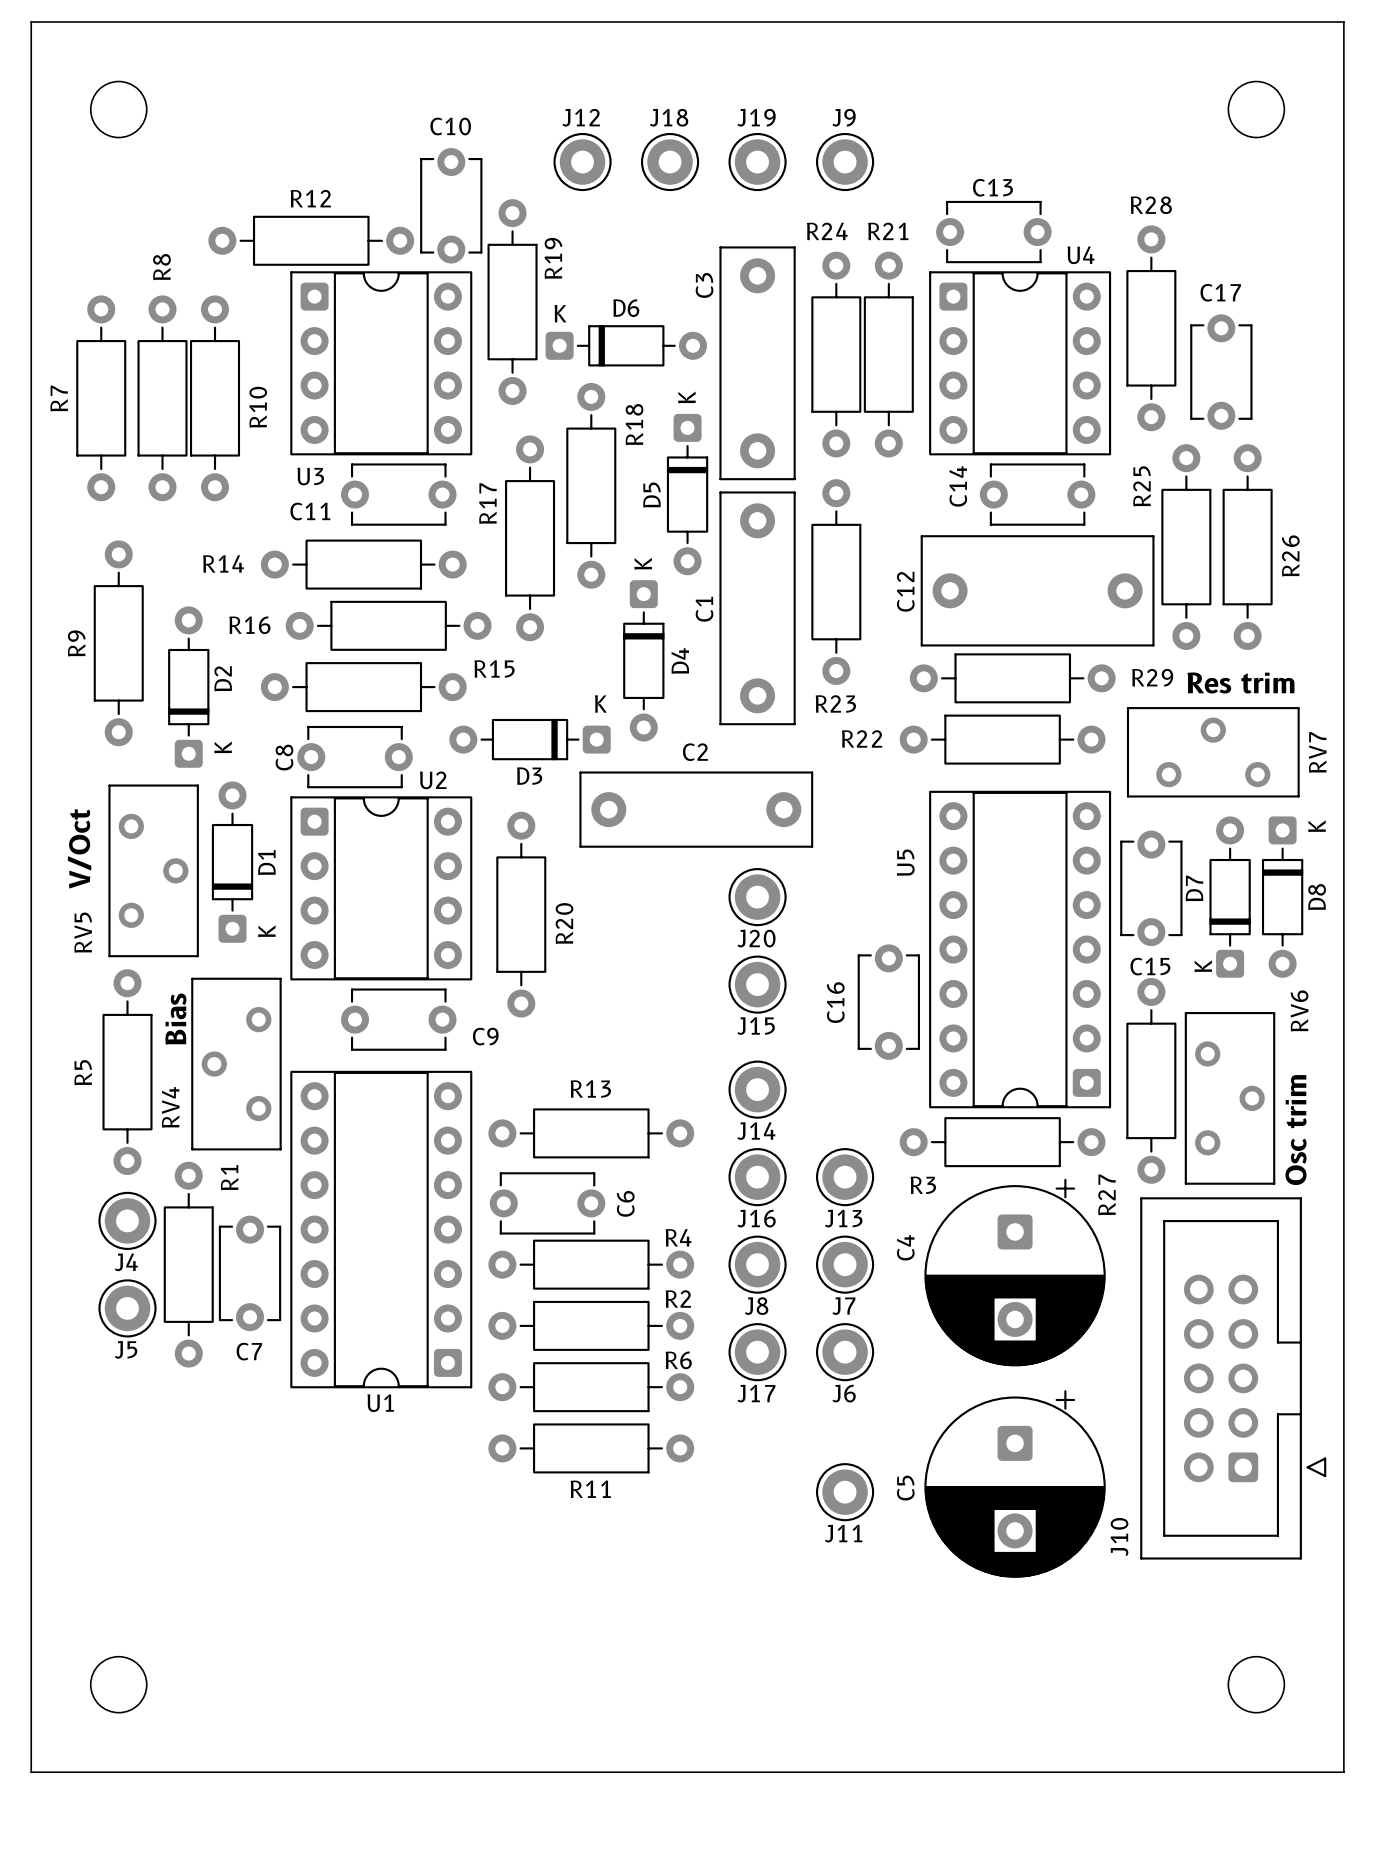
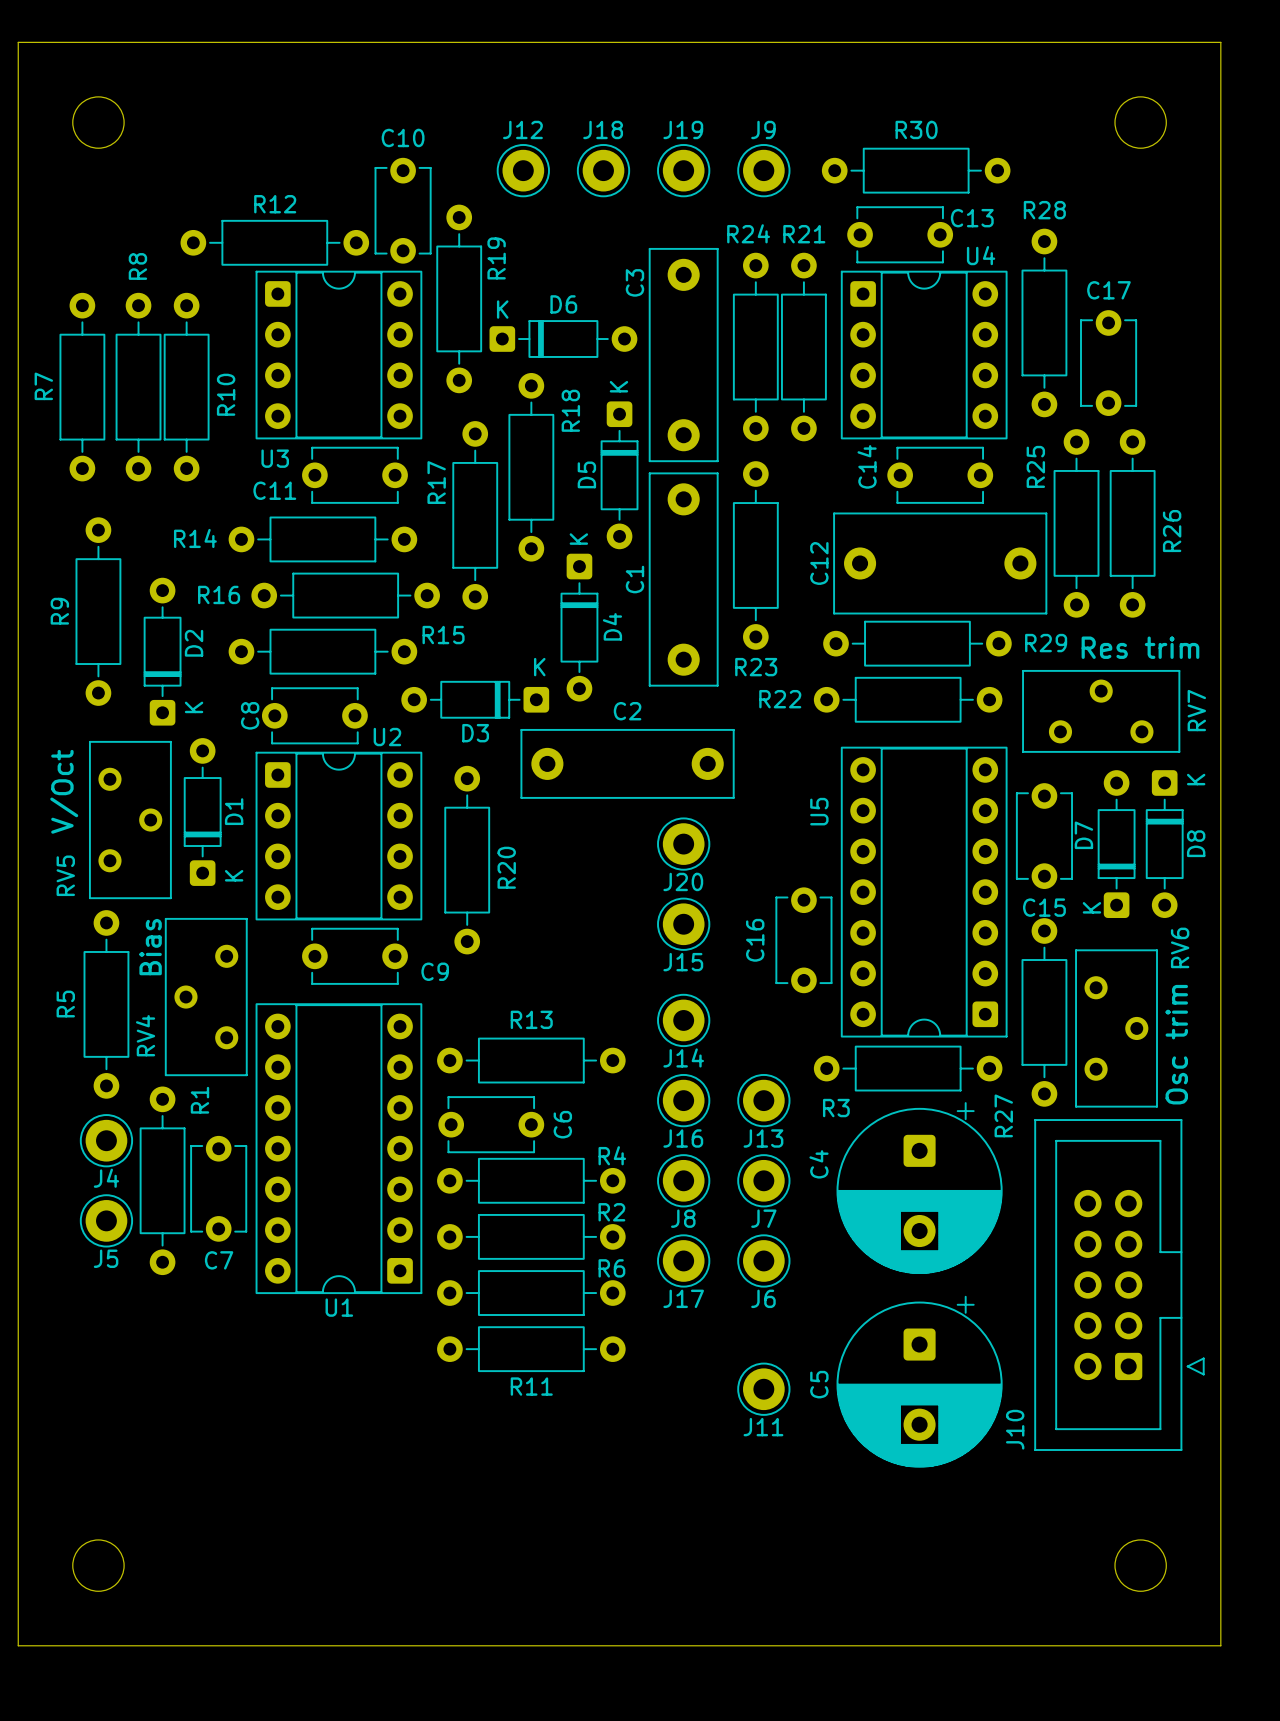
R30: none -> (916, 170)
C13 name position: C13 (992, 187) -> C13 (972, 218)

